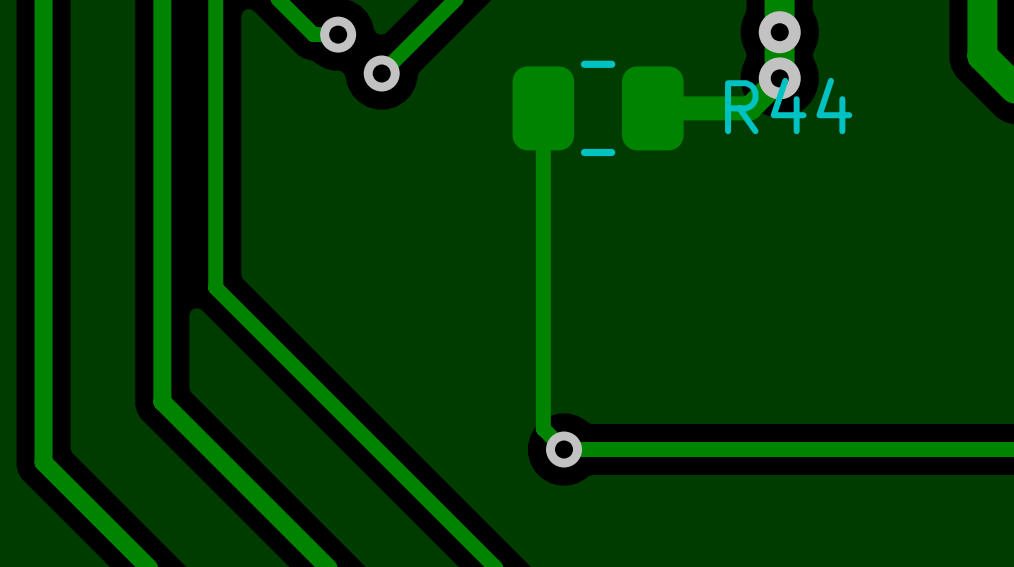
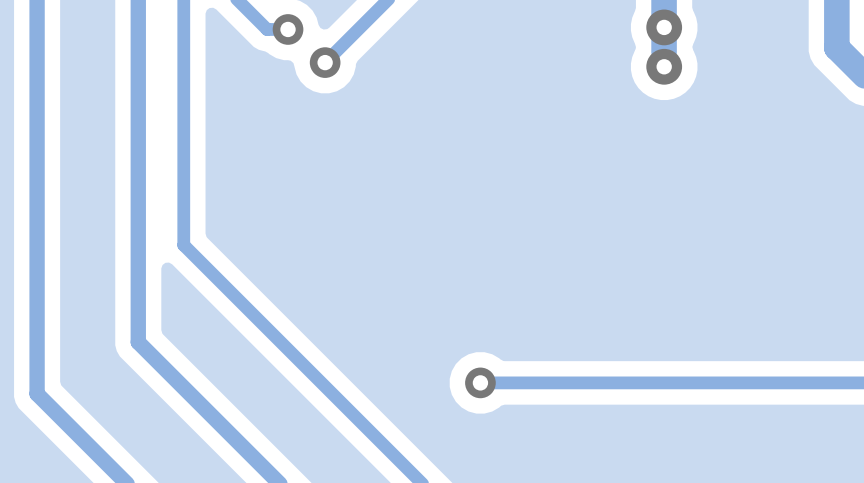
track: (779, 78) (749, 108) (652, 108) -> none
track: (543, 108) (543, 428) (564, 449) -> none
R44: (598, 108) -> none

